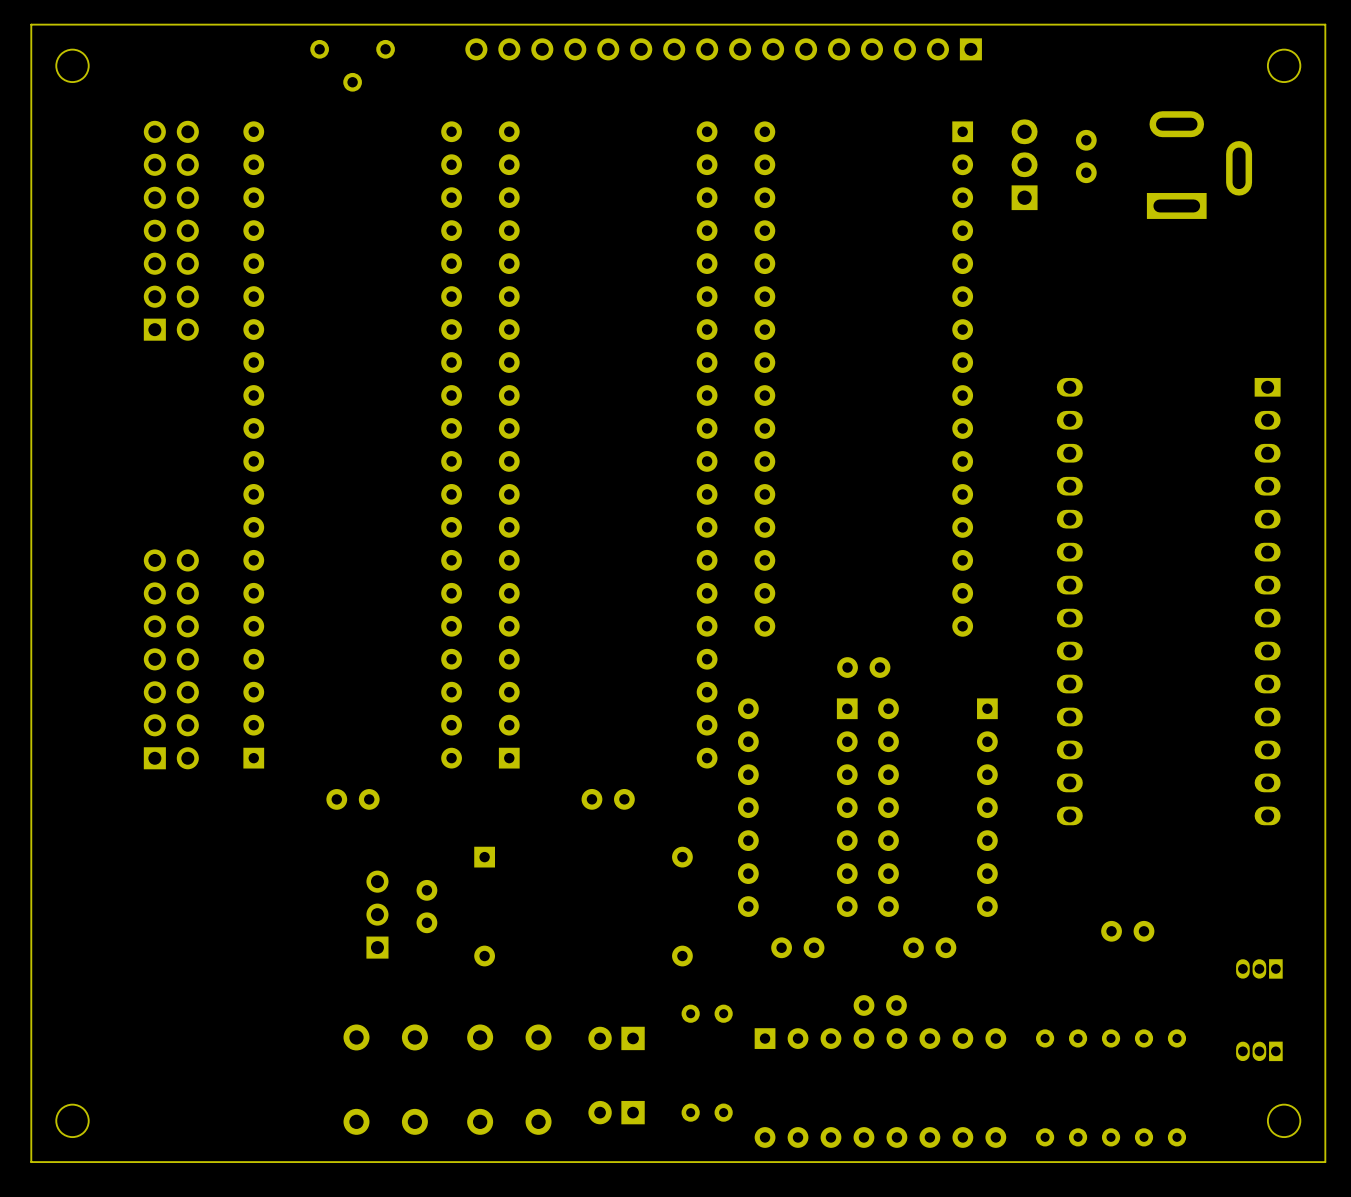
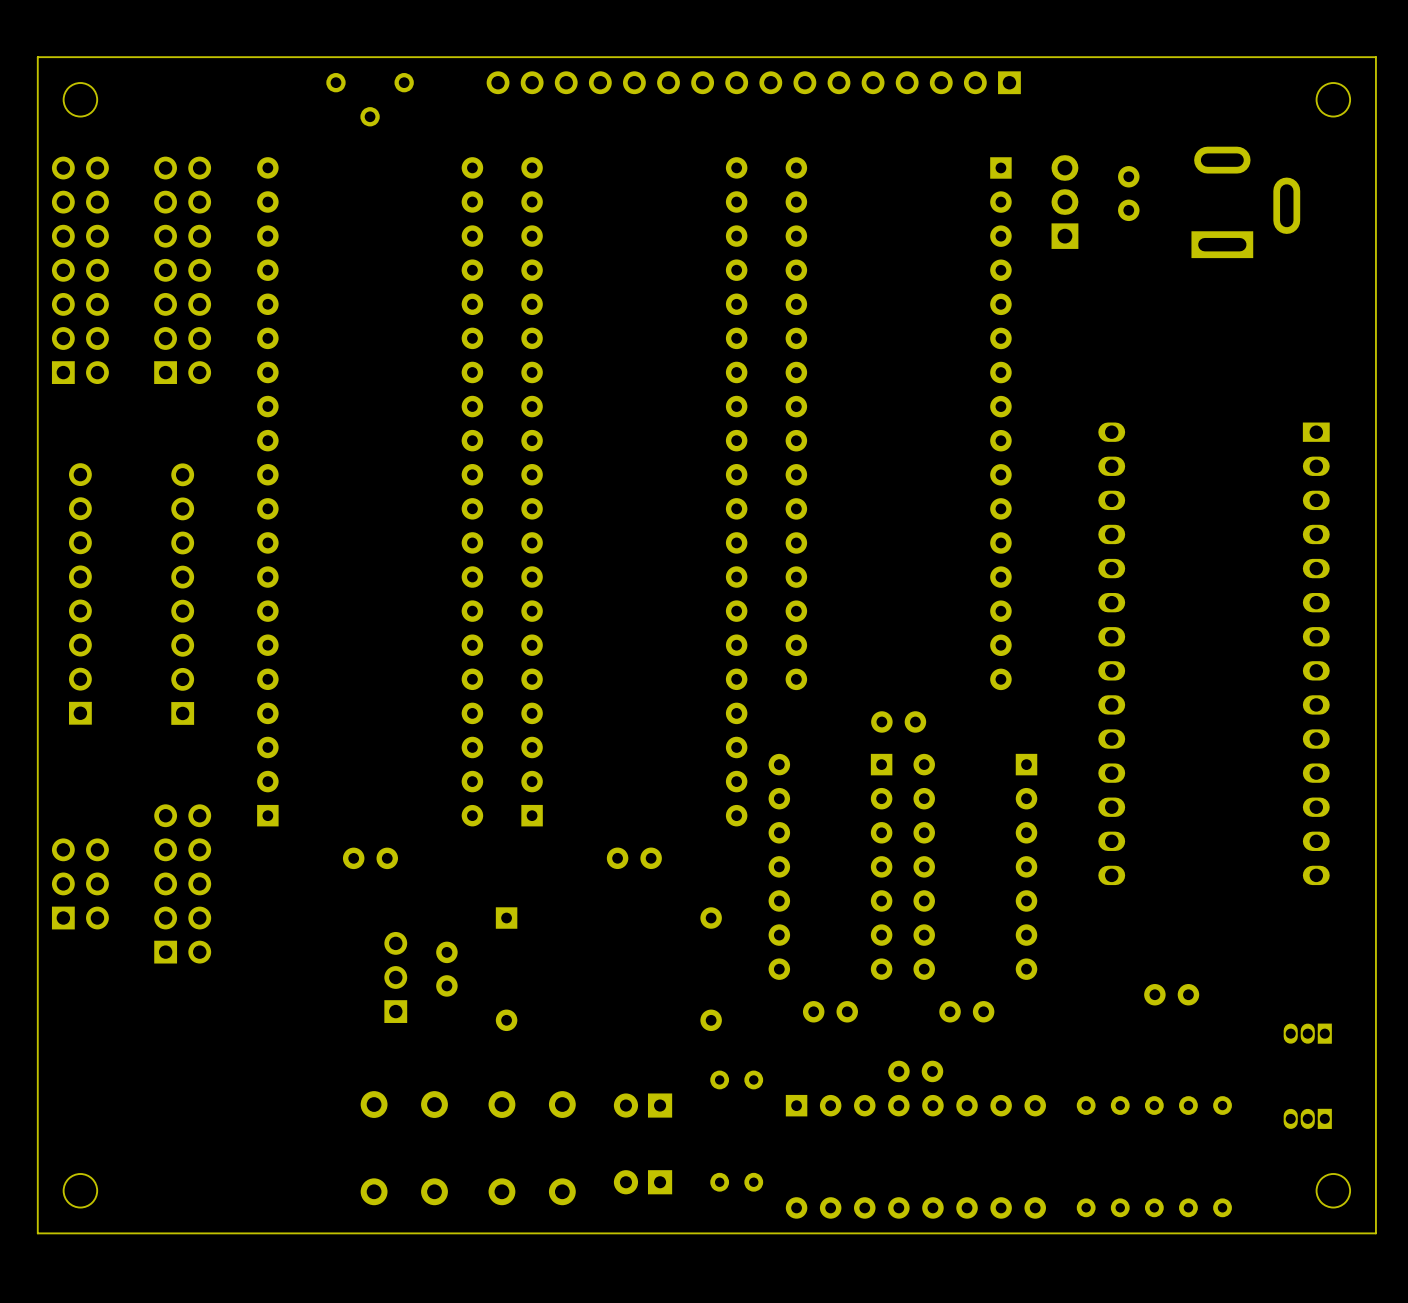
part: none -> (80, 270)
part: none -> (80, 593)
part: none -> (182, 594)
part: (171, 659) -> none
part: none -> (80, 883)
part: none -> (182, 883)

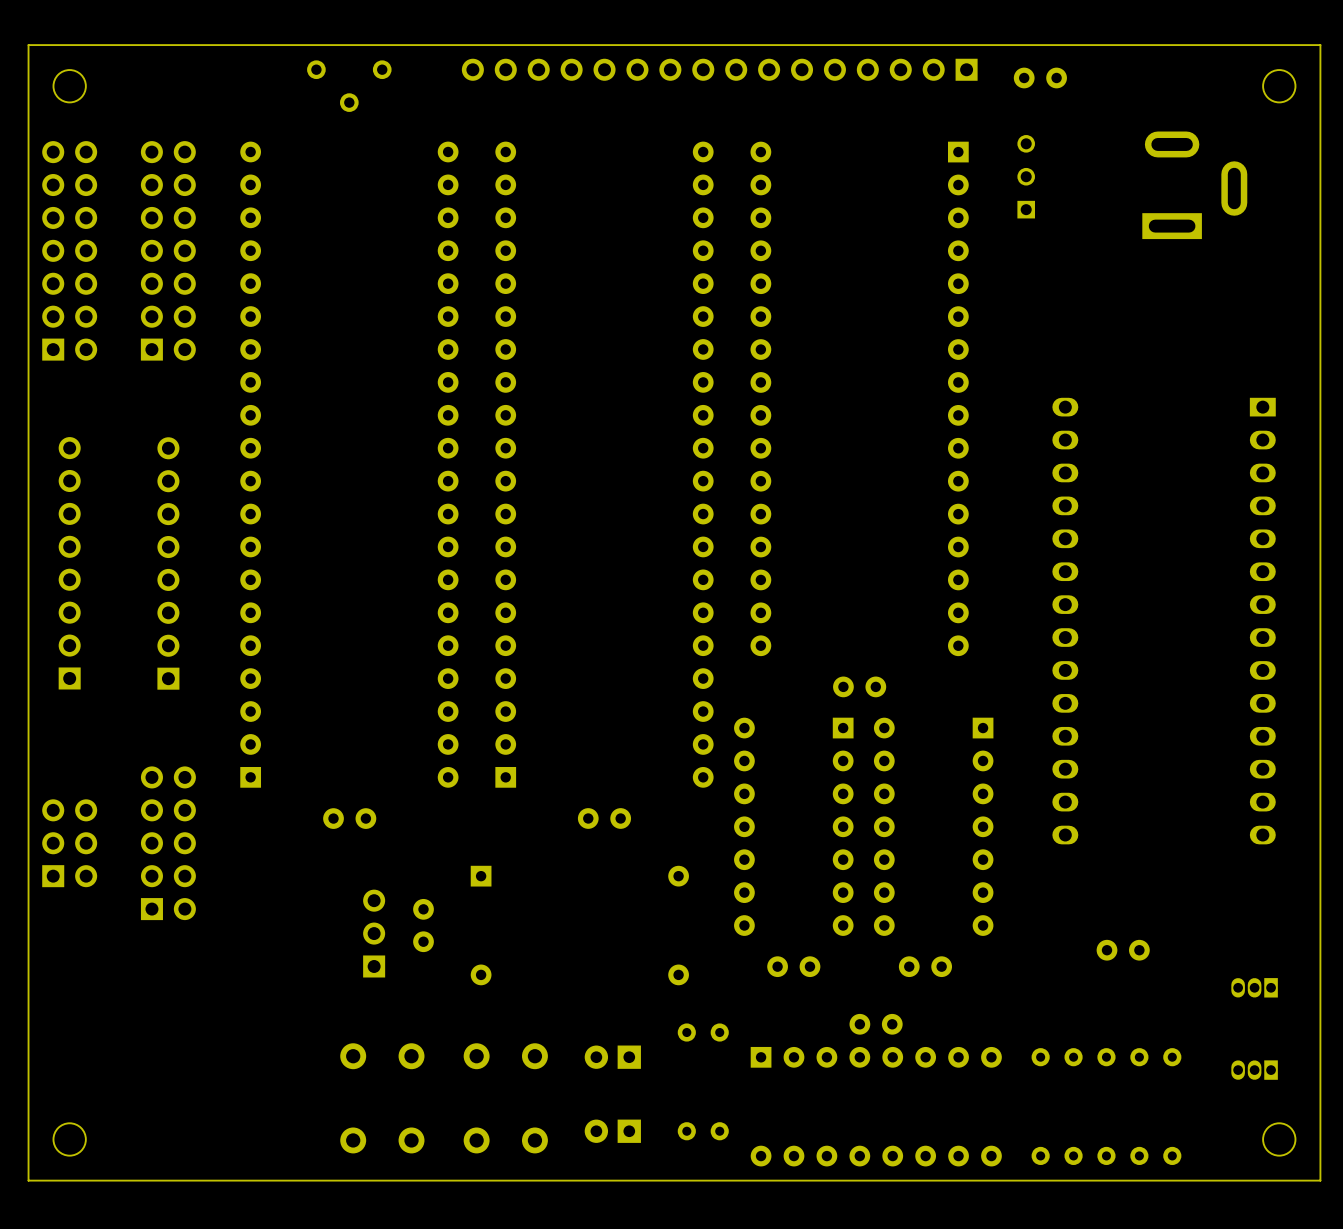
part footprint: [1051, 155, 1079, 249] -> [1017, 135, 1036, 219]
part rotation: 0° (1128, 193) -> 90° clockwise (1040, 77)
part position: (1128, 193) -> (1040, 77)

